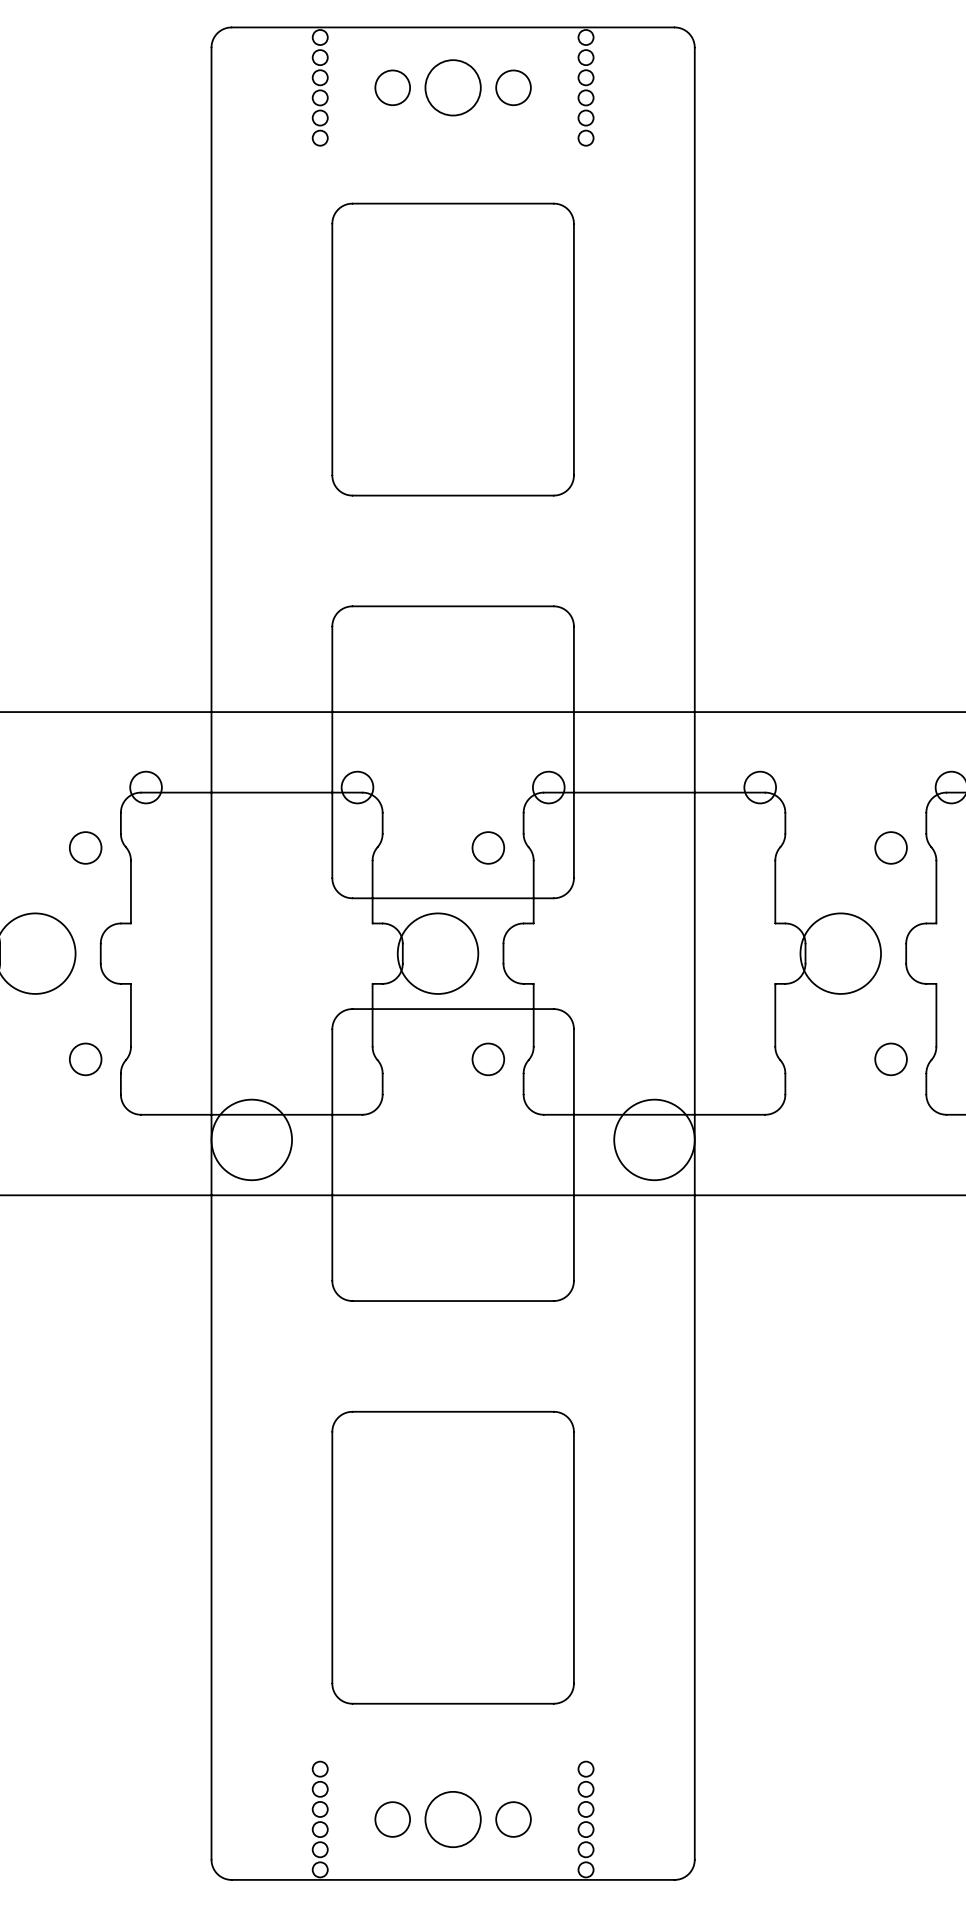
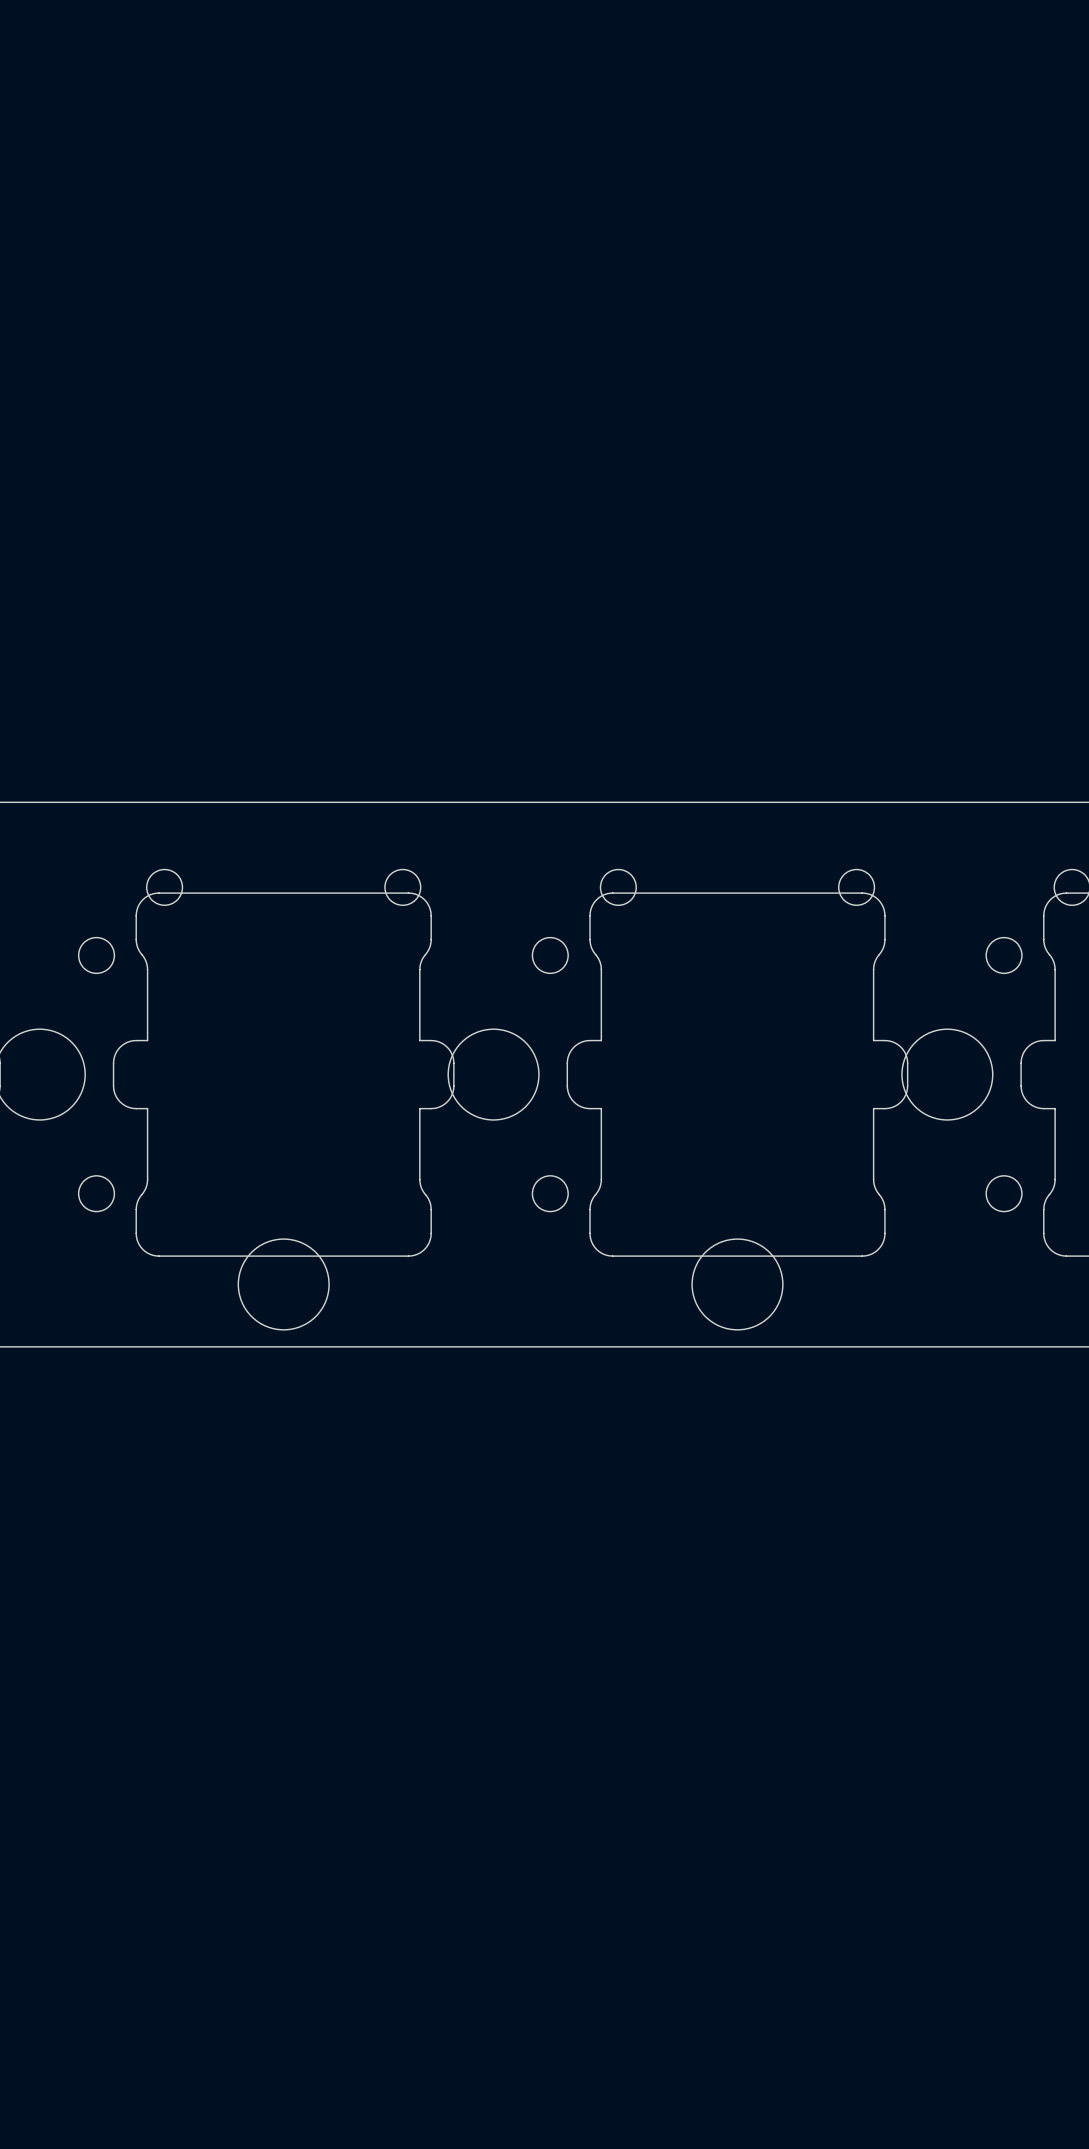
board edge: (231, 27) (674, 27) (686, 31) (694, 42) (694, 1859) (690, 1872) (679, 1879) (231, 1879) (219, 1875) (212, 1865) (211, 47) (213, 39) (217, 33) (223, 28) (231, 27) -> none
round board edge: [312, 29, 329, 46] -> none
round board edge: [577, 29, 595, 46] -> none
round board edge: [312, 49, 329, 66] -> none
round board edge: [577, 49, 595, 66] -> none
round board edge: [424, 59, 482, 117] -> none
round board edge: [312, 69, 329, 86] -> none
round board edge: [374, 69, 411, 106] -> none
round board edge: [495, 69, 532, 106] -> none
round board edge: [577, 69, 595, 86] -> none
round board edge: [312, 89, 329, 106] -> none
round board edge: [577, 89, 595, 106] -> none
round board edge: [312, 109, 329, 127] -> none
round board edge: [577, 109, 595, 127] -> none
round board edge: [312, 130, 329, 147] -> none
round board edge: [577, 130, 595, 147] -> none
board edge: (352, 203) (553, 203) (563, 206) (569, 211) (573, 223) (573, 475) (572, 483) (566, 491) (553, 495) (352, 495) (344, 494) (336, 487) (332, 475) (332, 223) (333, 216) (338, 209) (344, 205) (352, 203) -> none
board edge: (352, 606) (553, 606) (561, 607) (569, 614) (573, 626) (573, 878) (572, 885) (566, 894) (553, 898) (352, 898) (344, 896) (336, 890) (332, 878) (332, 626) (333, 618) (338, 612) (344, 607) (352, 606) -> none
board edge: (352, 1009) (553, 1009) (561, 1010) (569, 1016) (573, 1029) (573, 1280) (572, 1288) (566, 1296) (553, 1301) (352, 1301) (344, 1299) (336, 1293) (332, 1280) (332, 1029) (333, 1021) (338, 1014) (344, 1010) (352, 1009) -> none
board edge: (352, 1411) (553, 1411) (561, 1413) (569, 1419) (573, 1431) (573, 1683) (572, 1691) (566, 1699) (553, 1703) (352, 1703) (342, 1701) (336, 1695) (332, 1683) (332, 1431) (333, 1424) (338, 1417) (344, 1413) (352, 1411) -> none
round board edge: [312, 1761, 329, 1778] -> none
round board edge: [577, 1761, 595, 1778] -> none
round board edge: [312, 1781, 329, 1798] -> none
round board edge: [577, 1781, 595, 1798] -> none
round board edge: [424, 1791, 482, 1848] -> none
round board edge: [312, 1801, 329, 1818] -> none
round board edge: [374, 1801, 411, 1838] -> none
round board edge: [495, 1801, 532, 1838] -> none
round board edge: [577, 1801, 595, 1818] -> none
round board edge: [312, 1821, 329, 1838] -> none
round board edge: [577, 1821, 595, 1838] -> none
round board edge: [312, 1841, 329, 1858] -> none
round board edge: [577, 1841, 595, 1858] -> none
round board edge: [312, 1861, 329, 1878] -> none
round board edge: [577, 1861, 595, 1878] -> none

